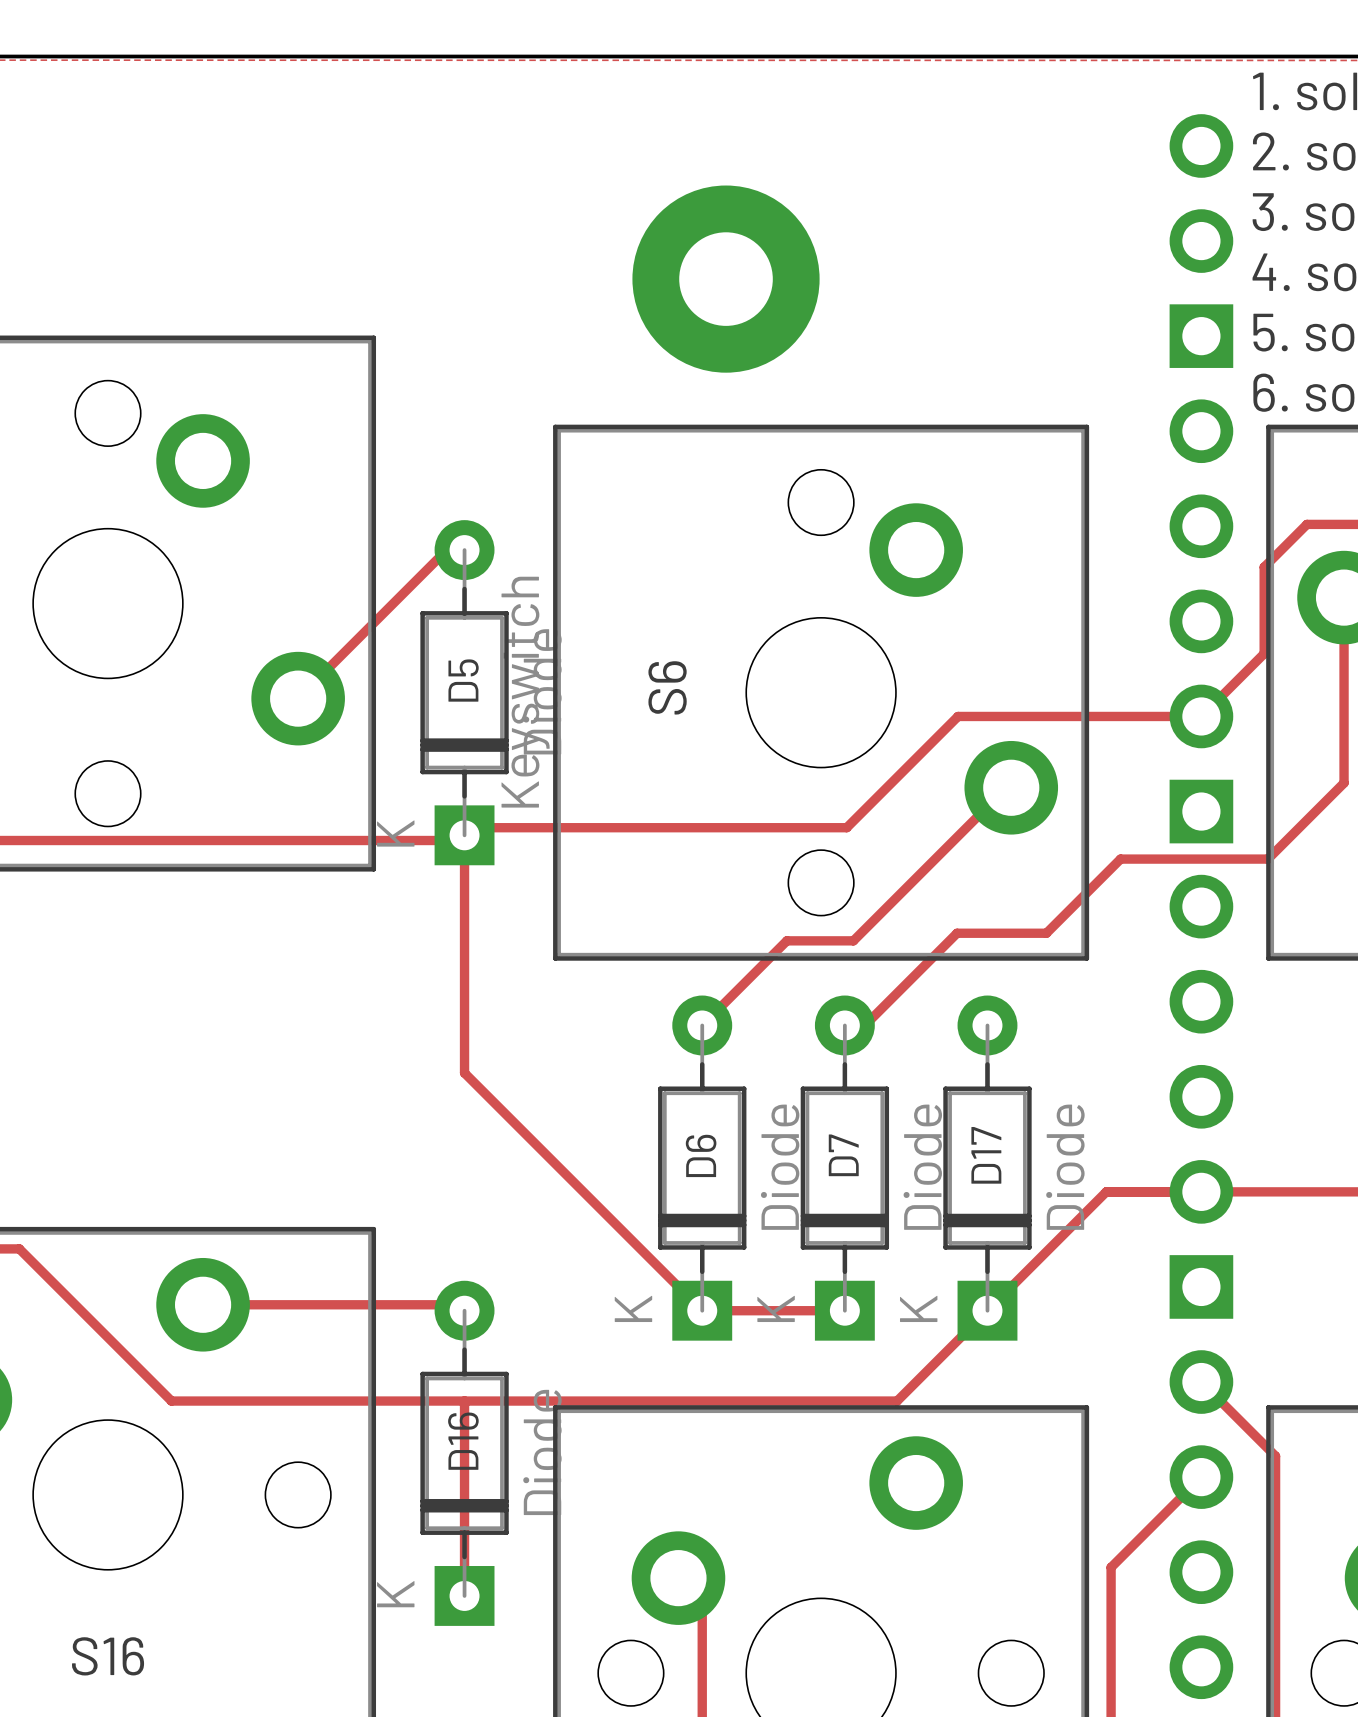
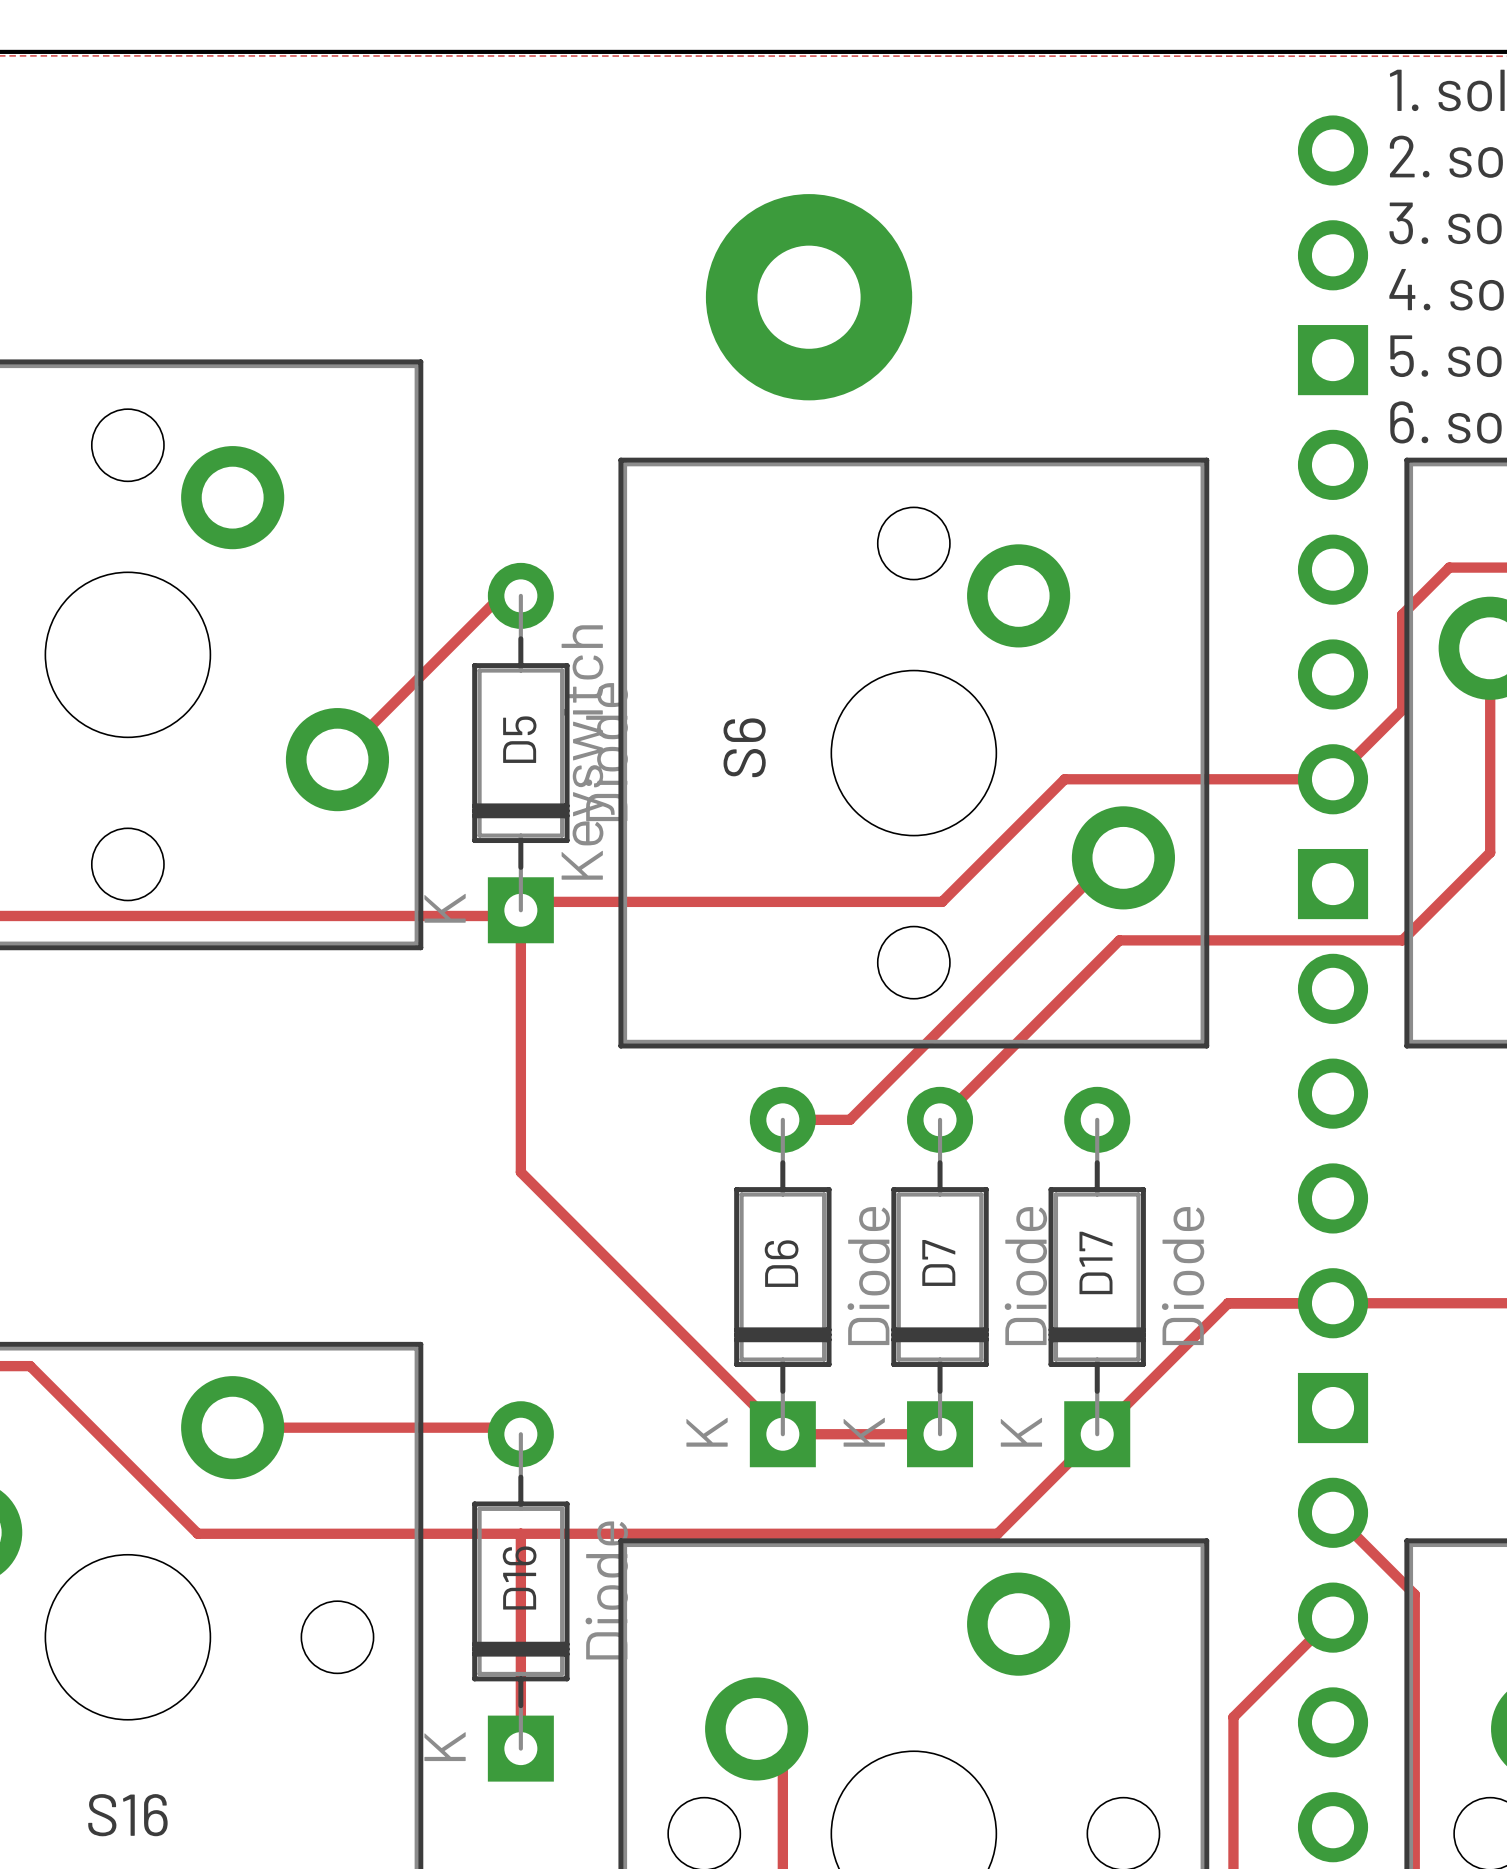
track: (1006, 787) (853, 940) (786, 940) (702, 1025) -> (1118, 857) (1111, 857) (849, 1119) (782, 1119)
track: (1267, 859) (1120, 859) (1046, 933) (957, 933) (864, 1025) (844, 1025) -> (1406, 936) (1402, 940) (1119, 940) (940, 1119)

